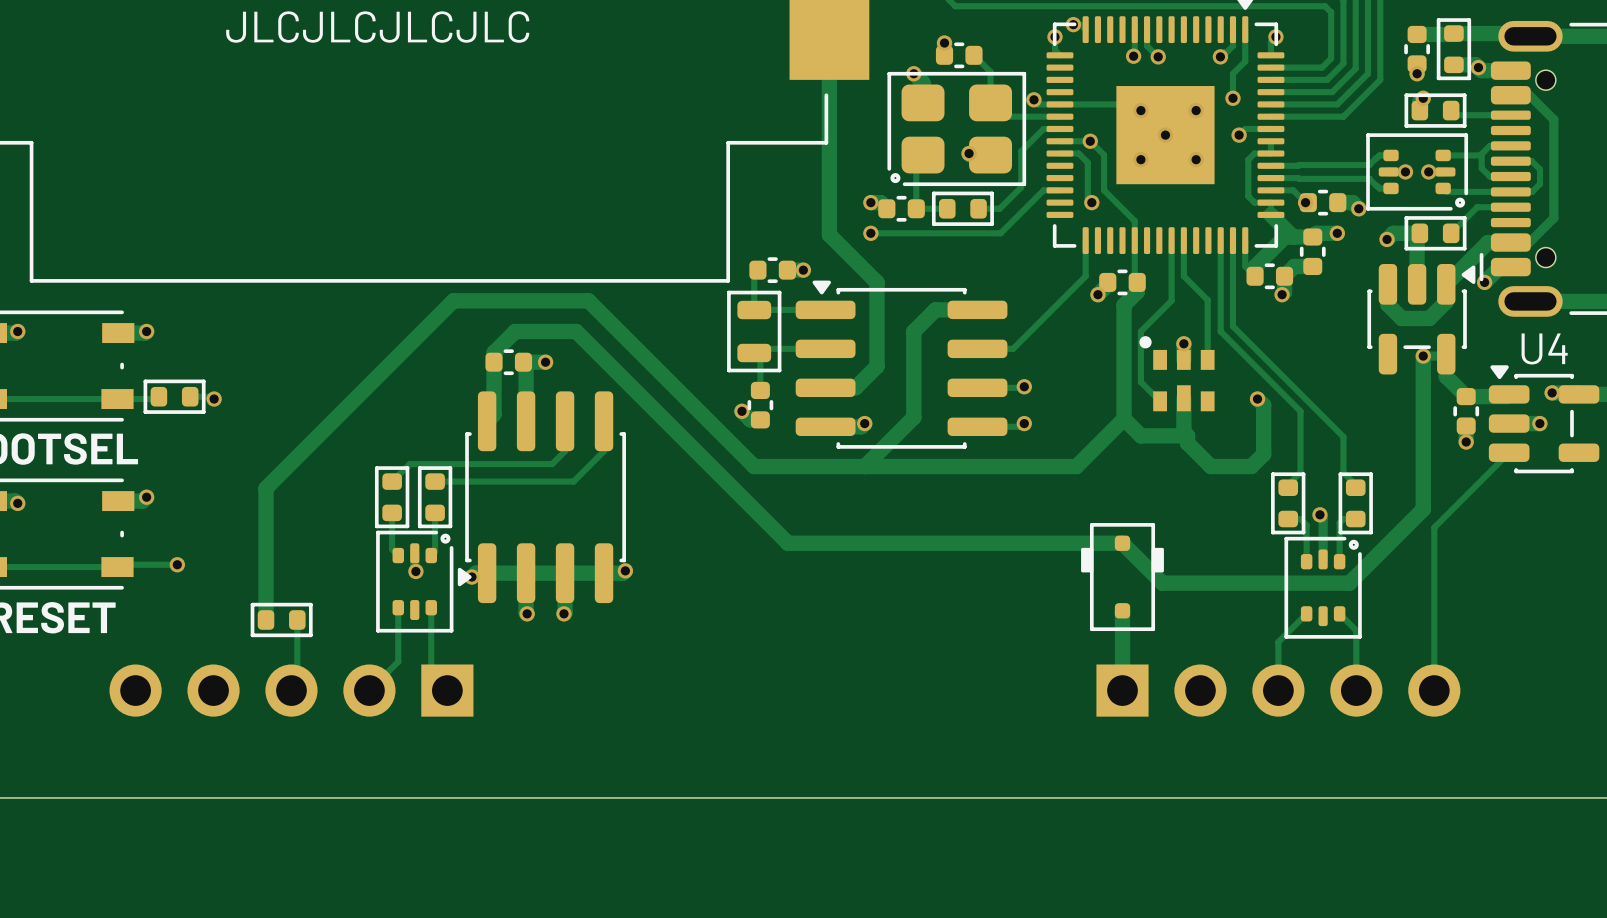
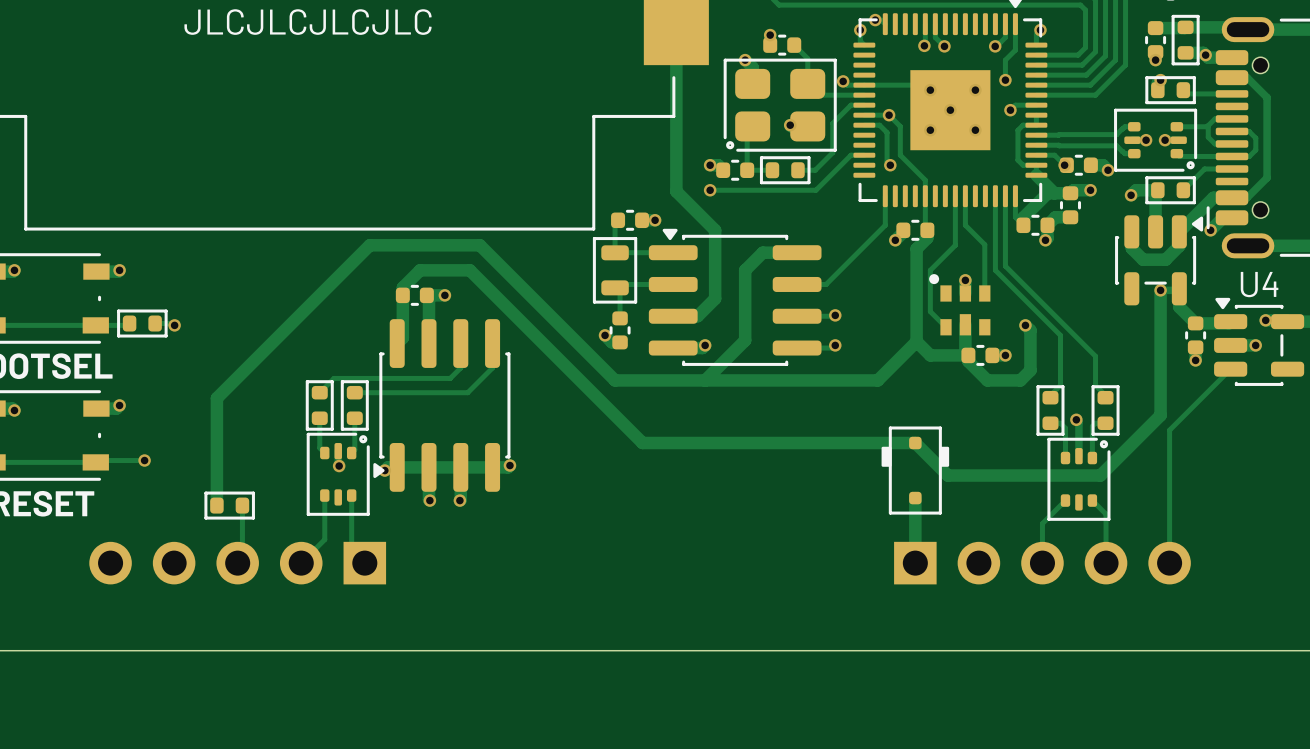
part: none -> (980, 355)
via: none -> (1005, 355)

